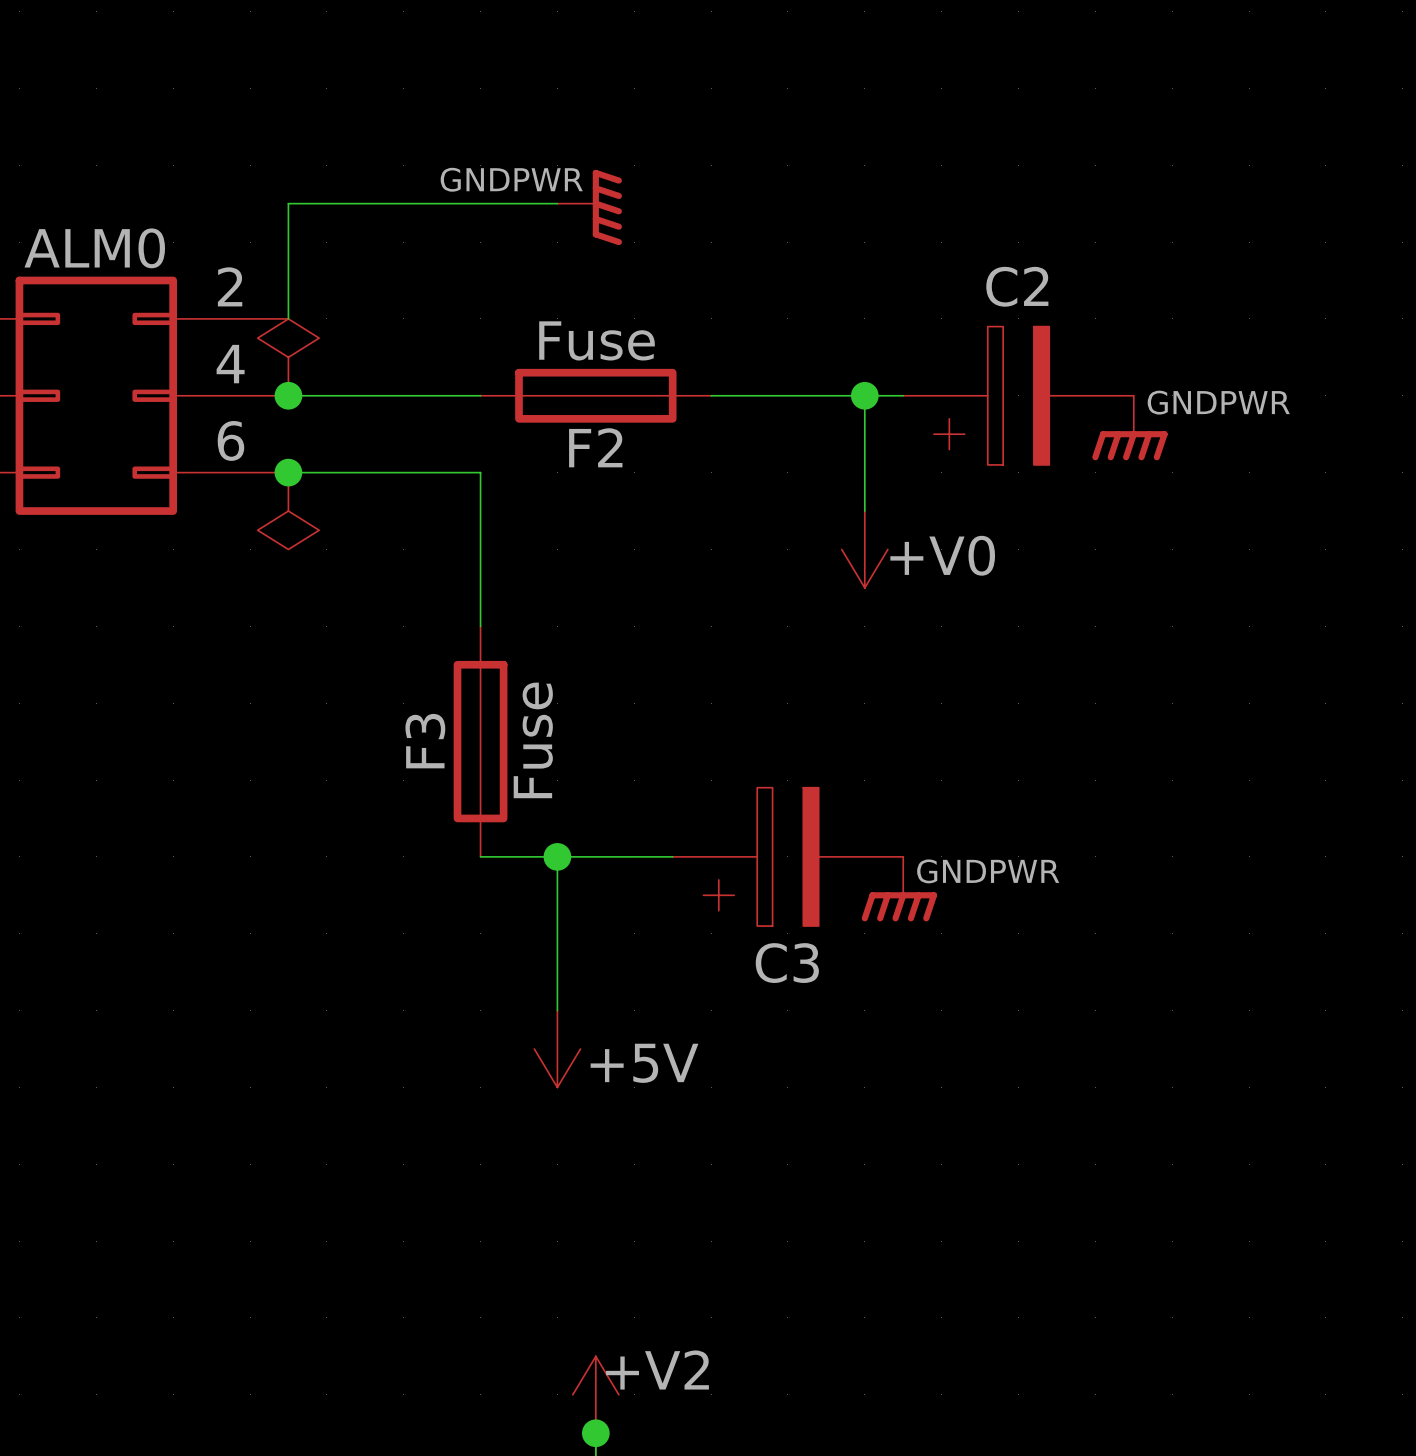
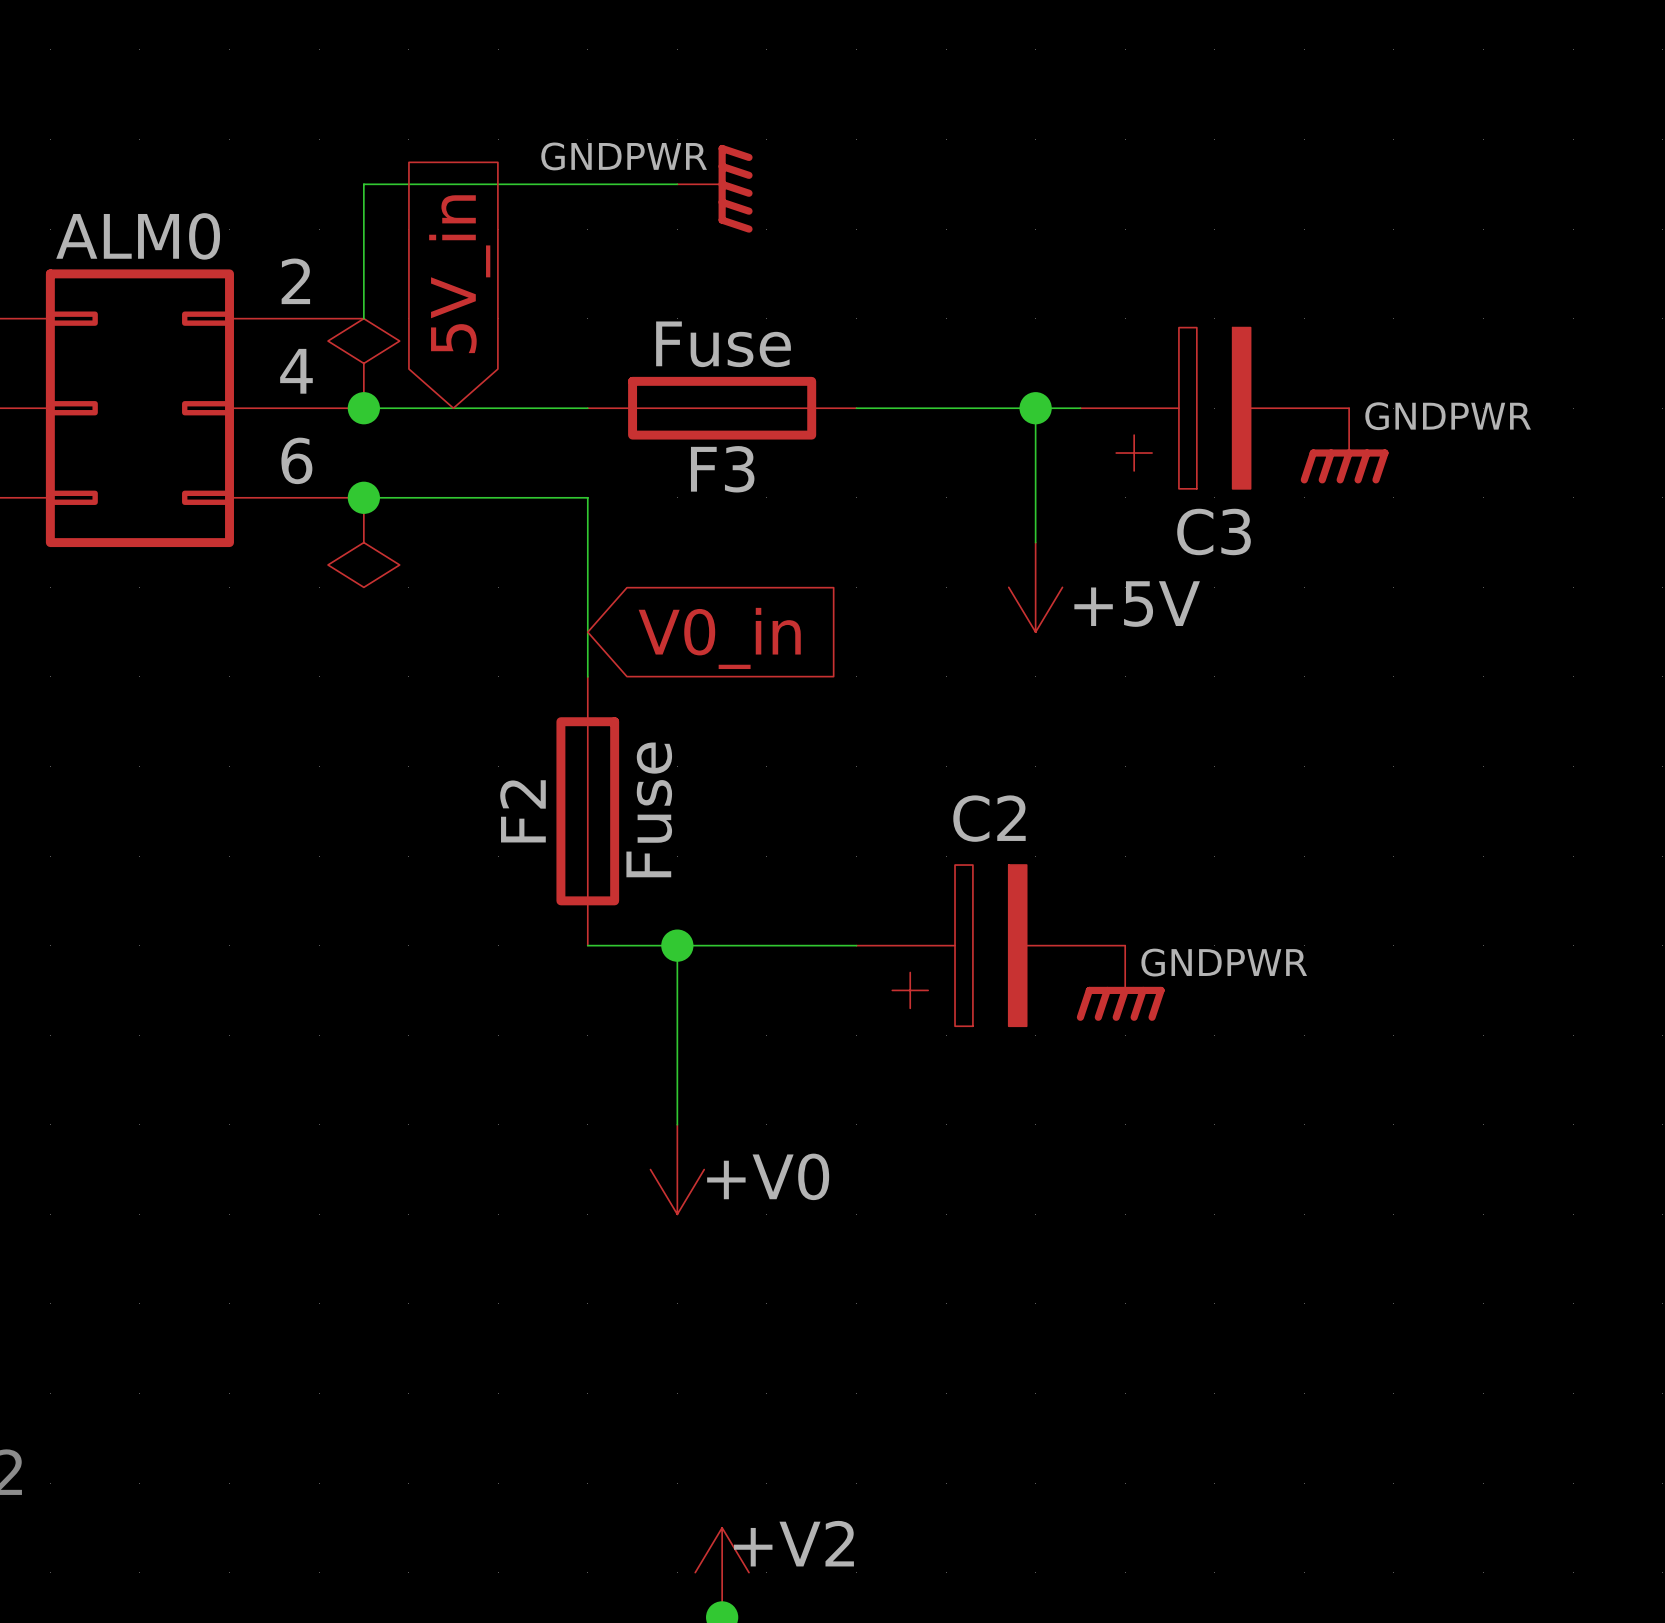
global label: none -> 5V_in (459, 274)
C2 name: C2 (1017, 286) -> C3 (1214, 531)
F2 name: F2 (595, 447) -> F3 (722, 469)
power symbol: +V0 (864, 549) -> +5V (1035, 587)
global label: none -> V0_in (719, 638)
F3 name: F3 (425, 741) -> F2 (523, 811)
C3: (787, 856) -> none
C2: none -> (990, 945)
power symbol position: GNDPWR (899, 889) -> GNDPWR (1120, 983)
power symbol: +5V (557, 1049) -> +V0 (677, 1169)

